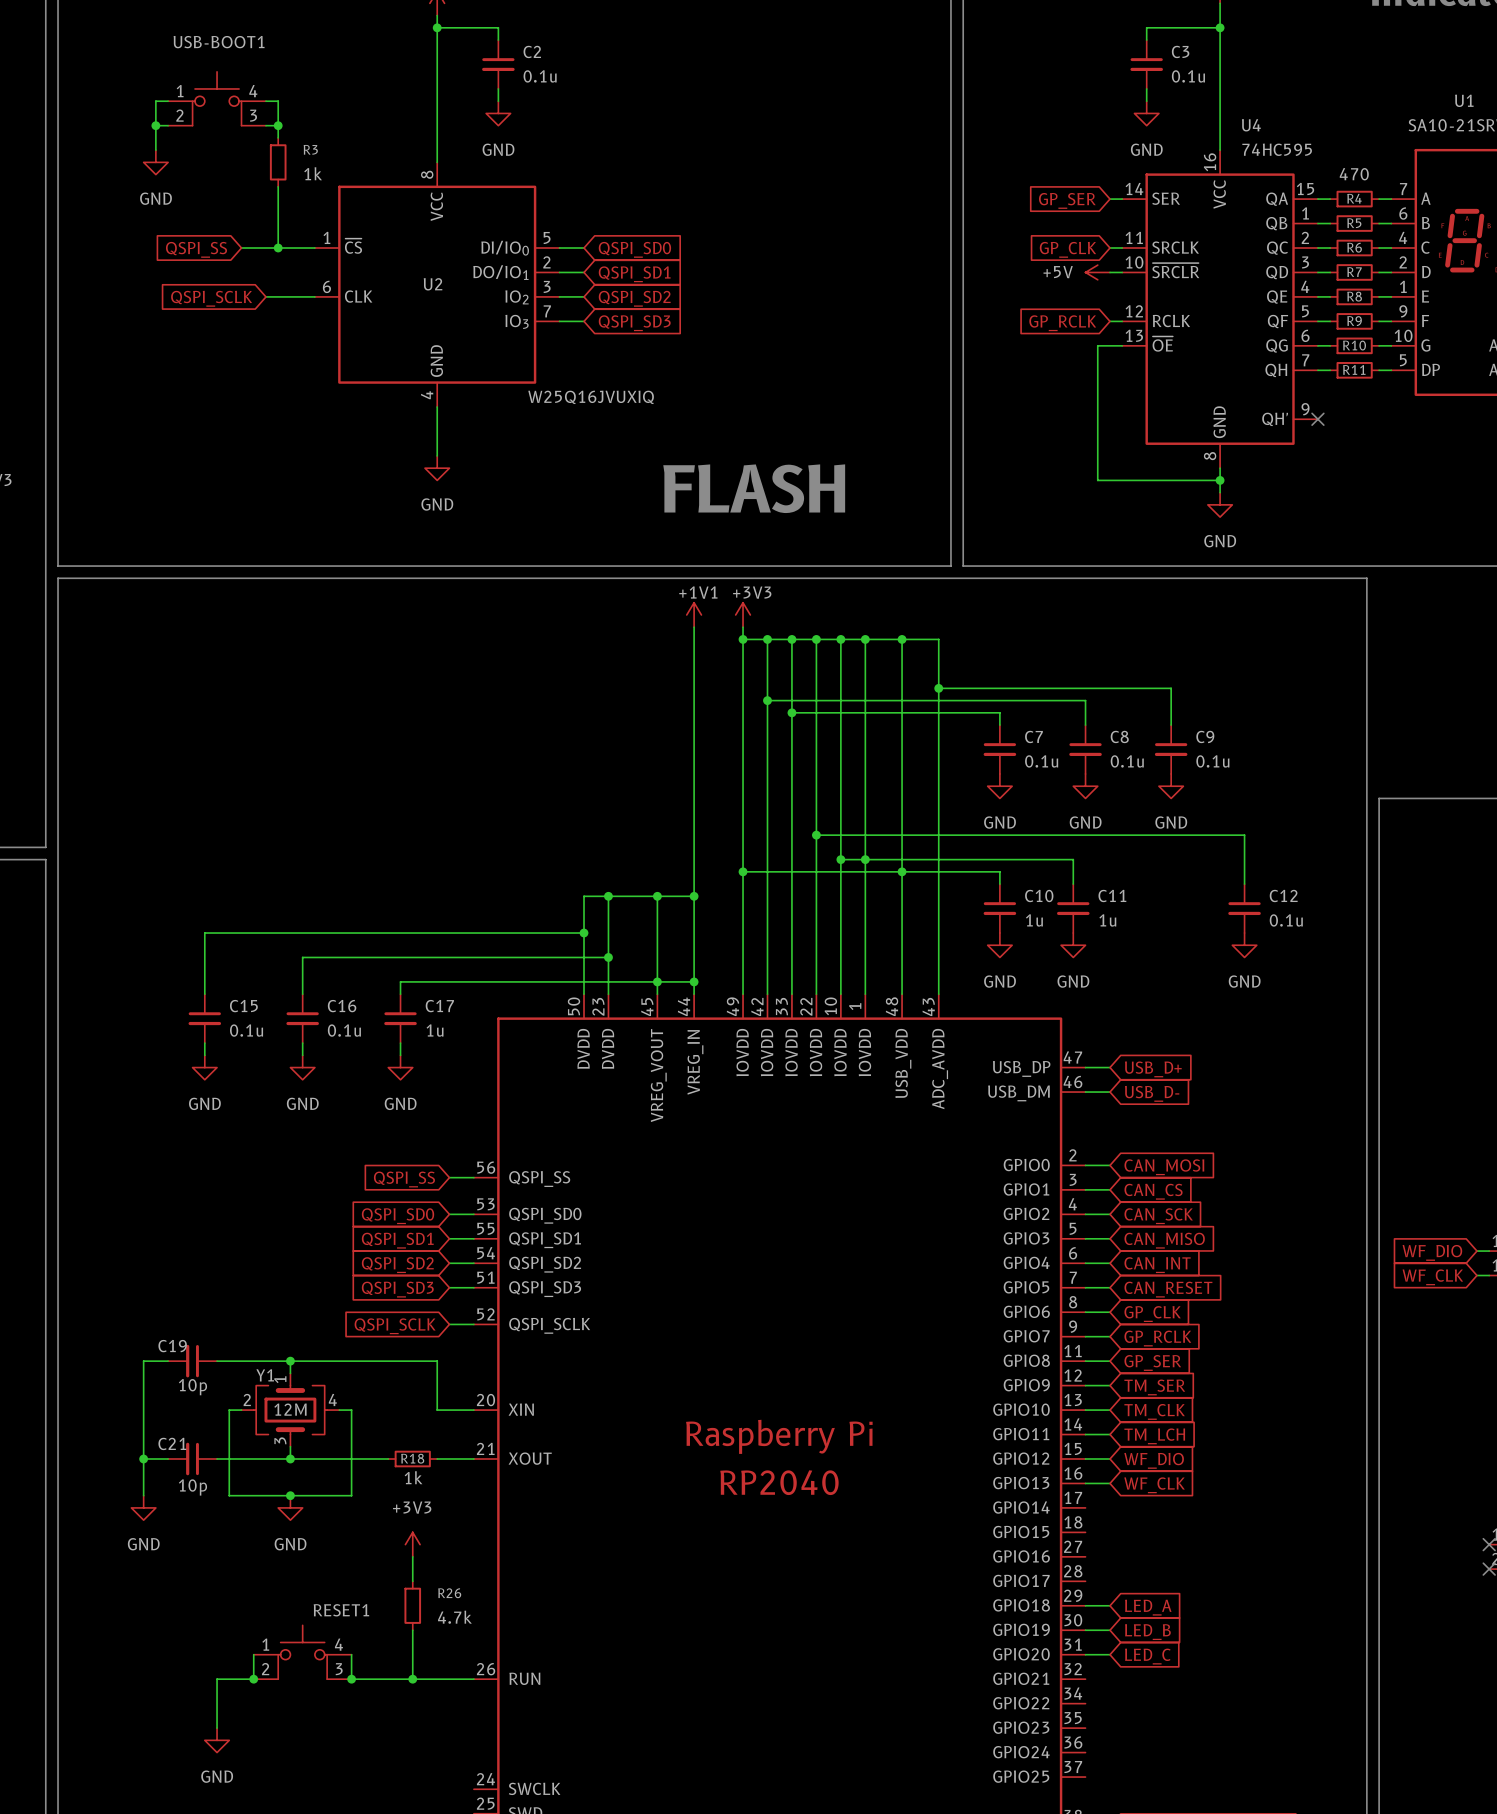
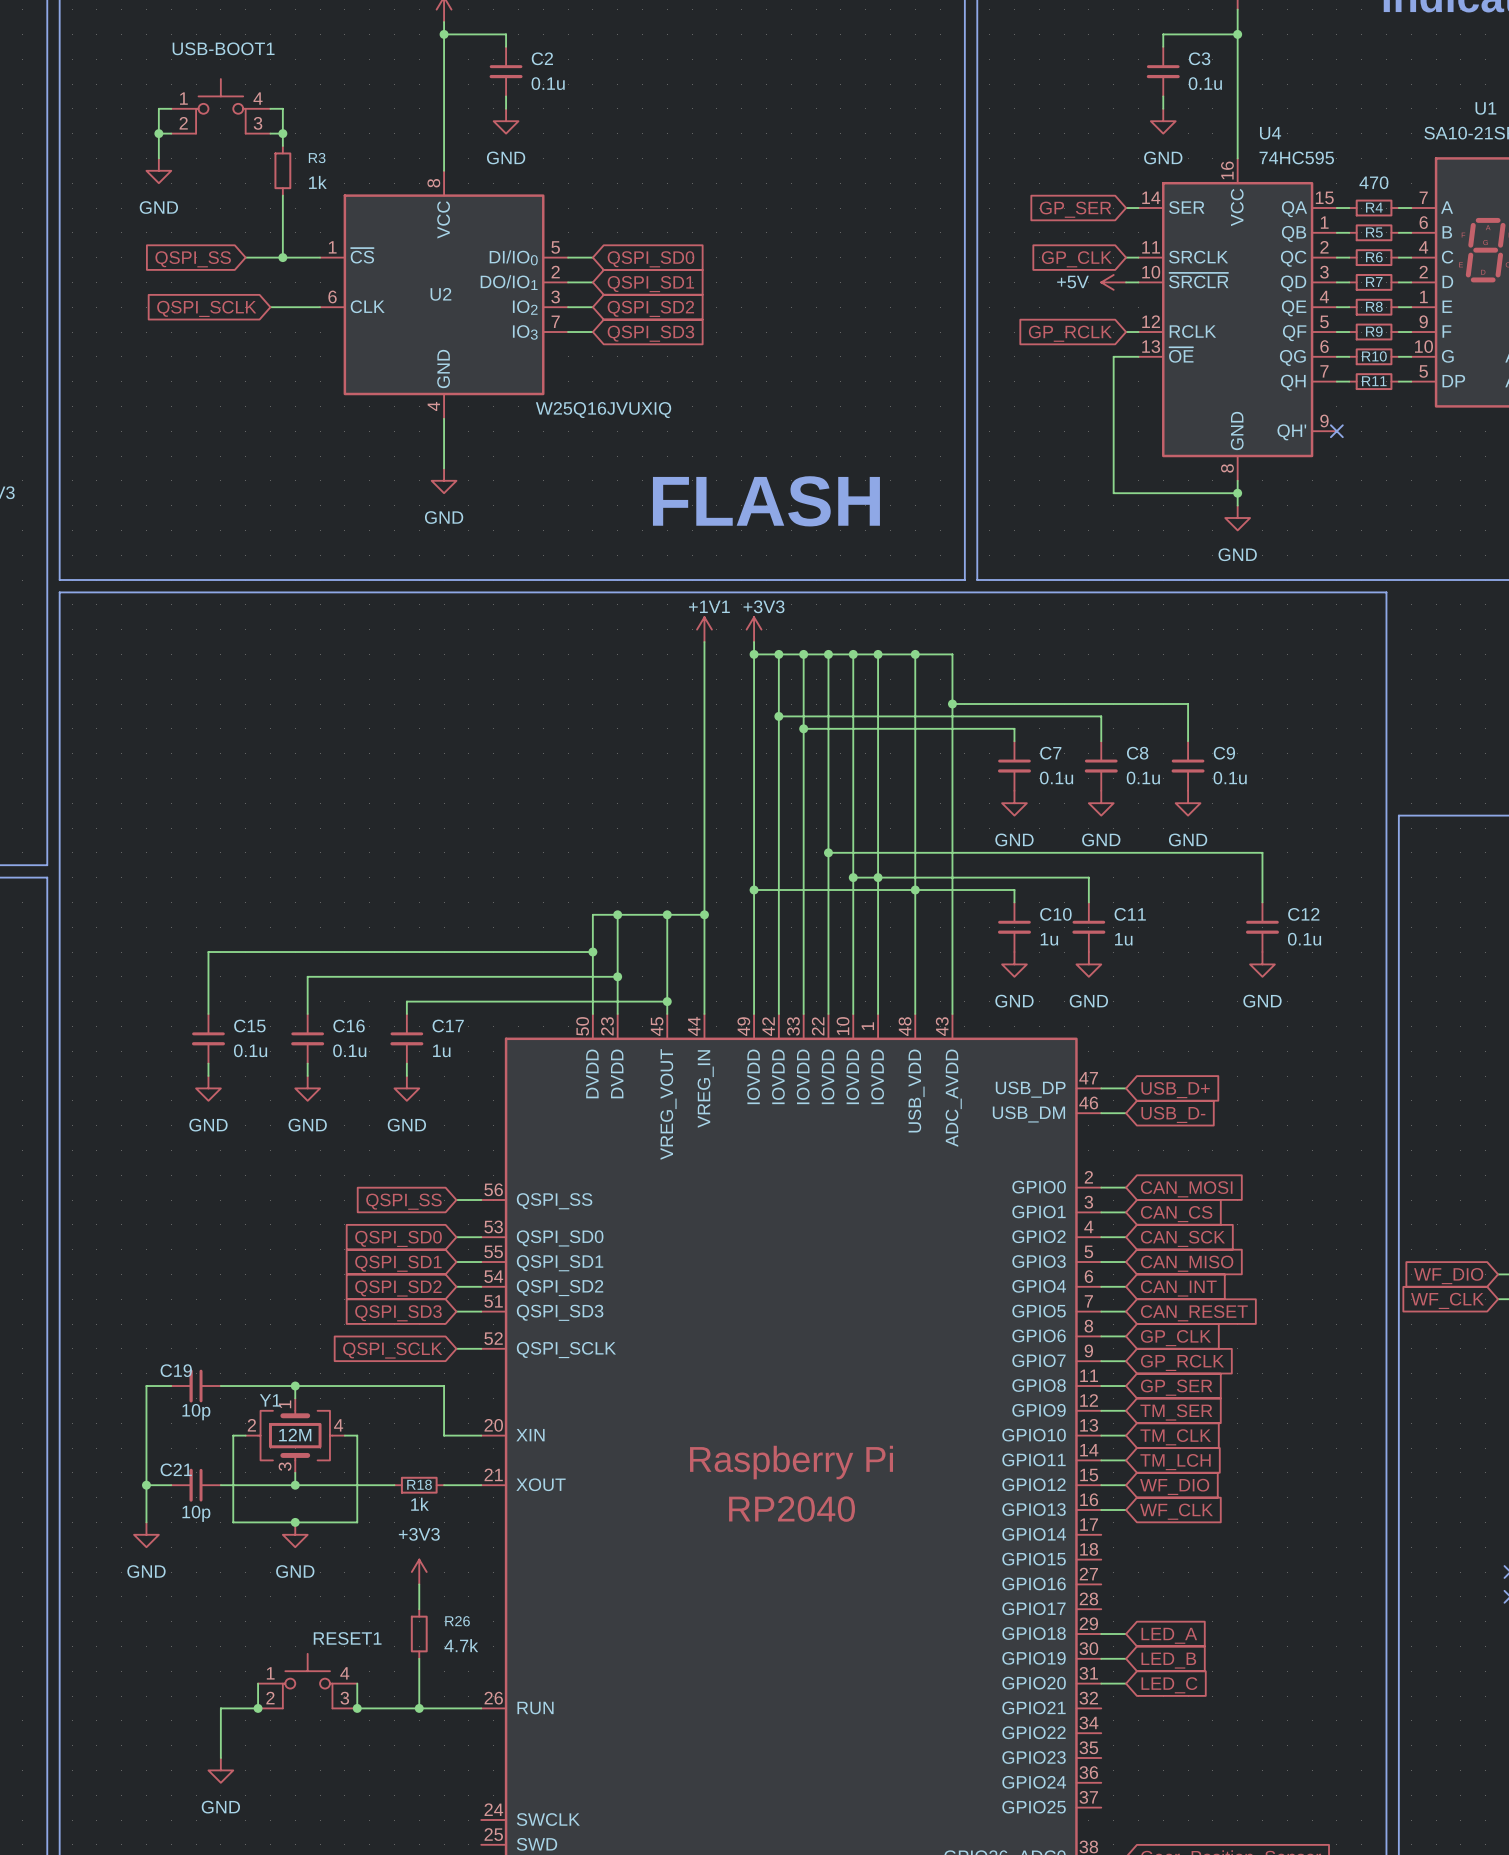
wire: (657, 981) (694, 981) -> none
junction: (694, 981) -> none

